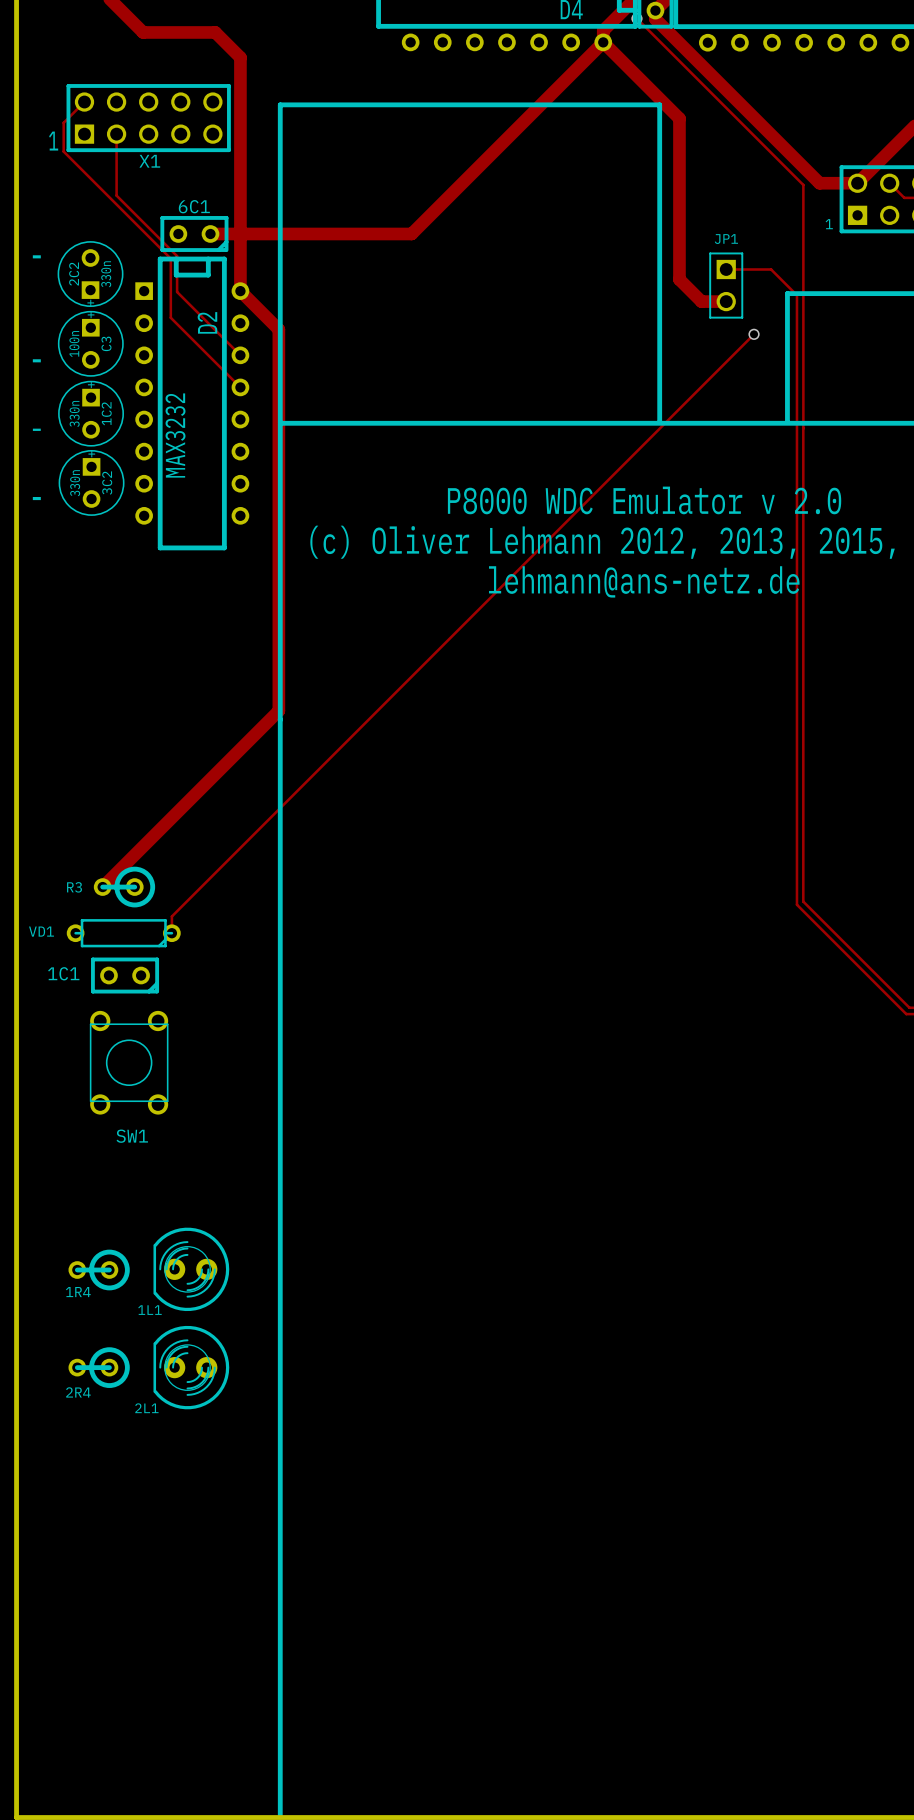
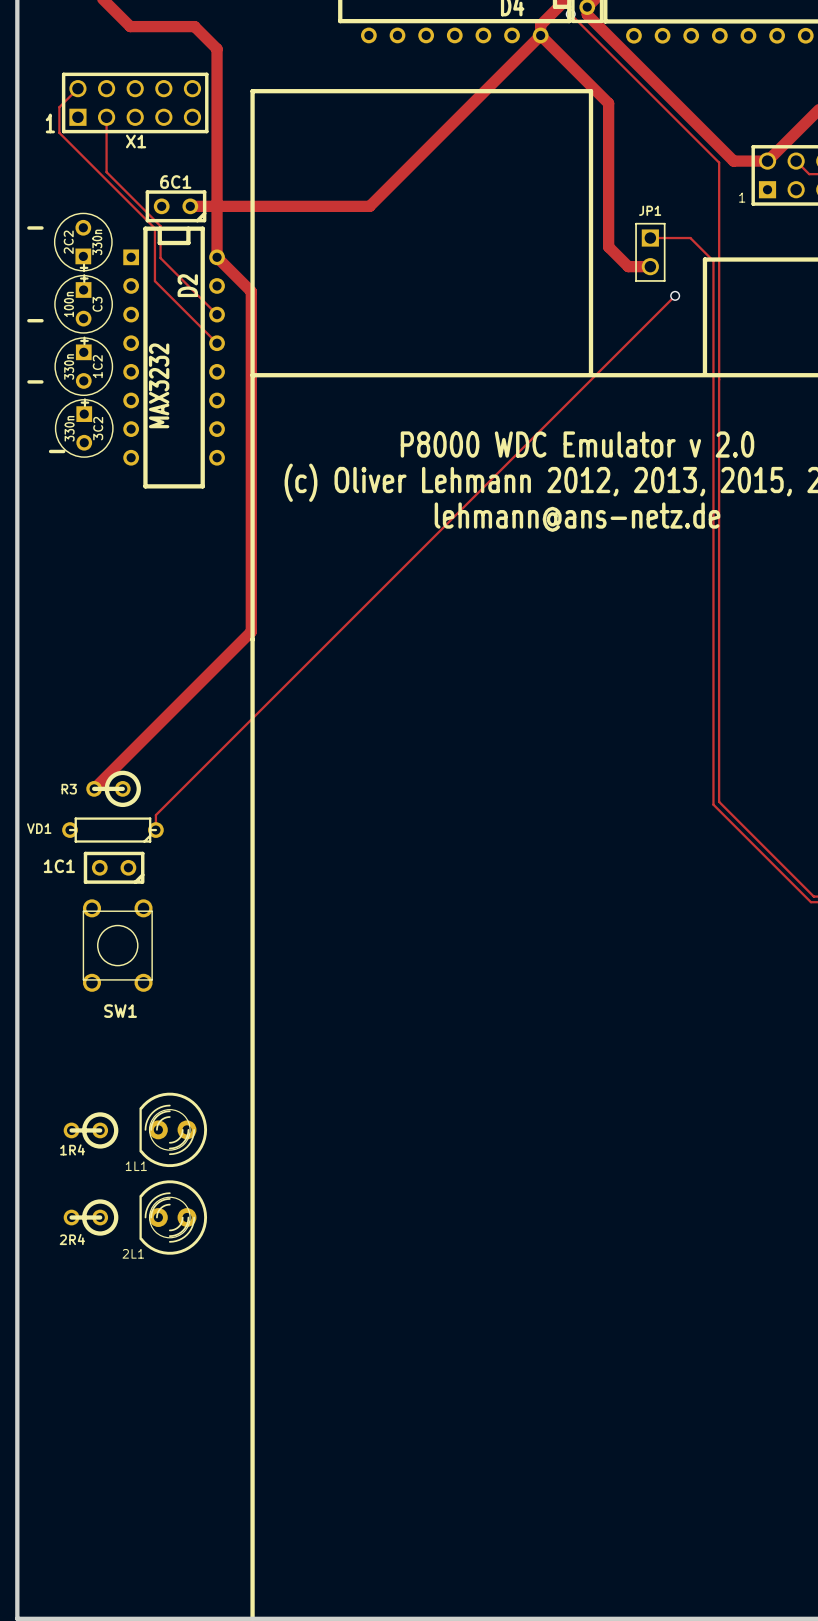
text position: - (36, 498) -> - (57, 451)

